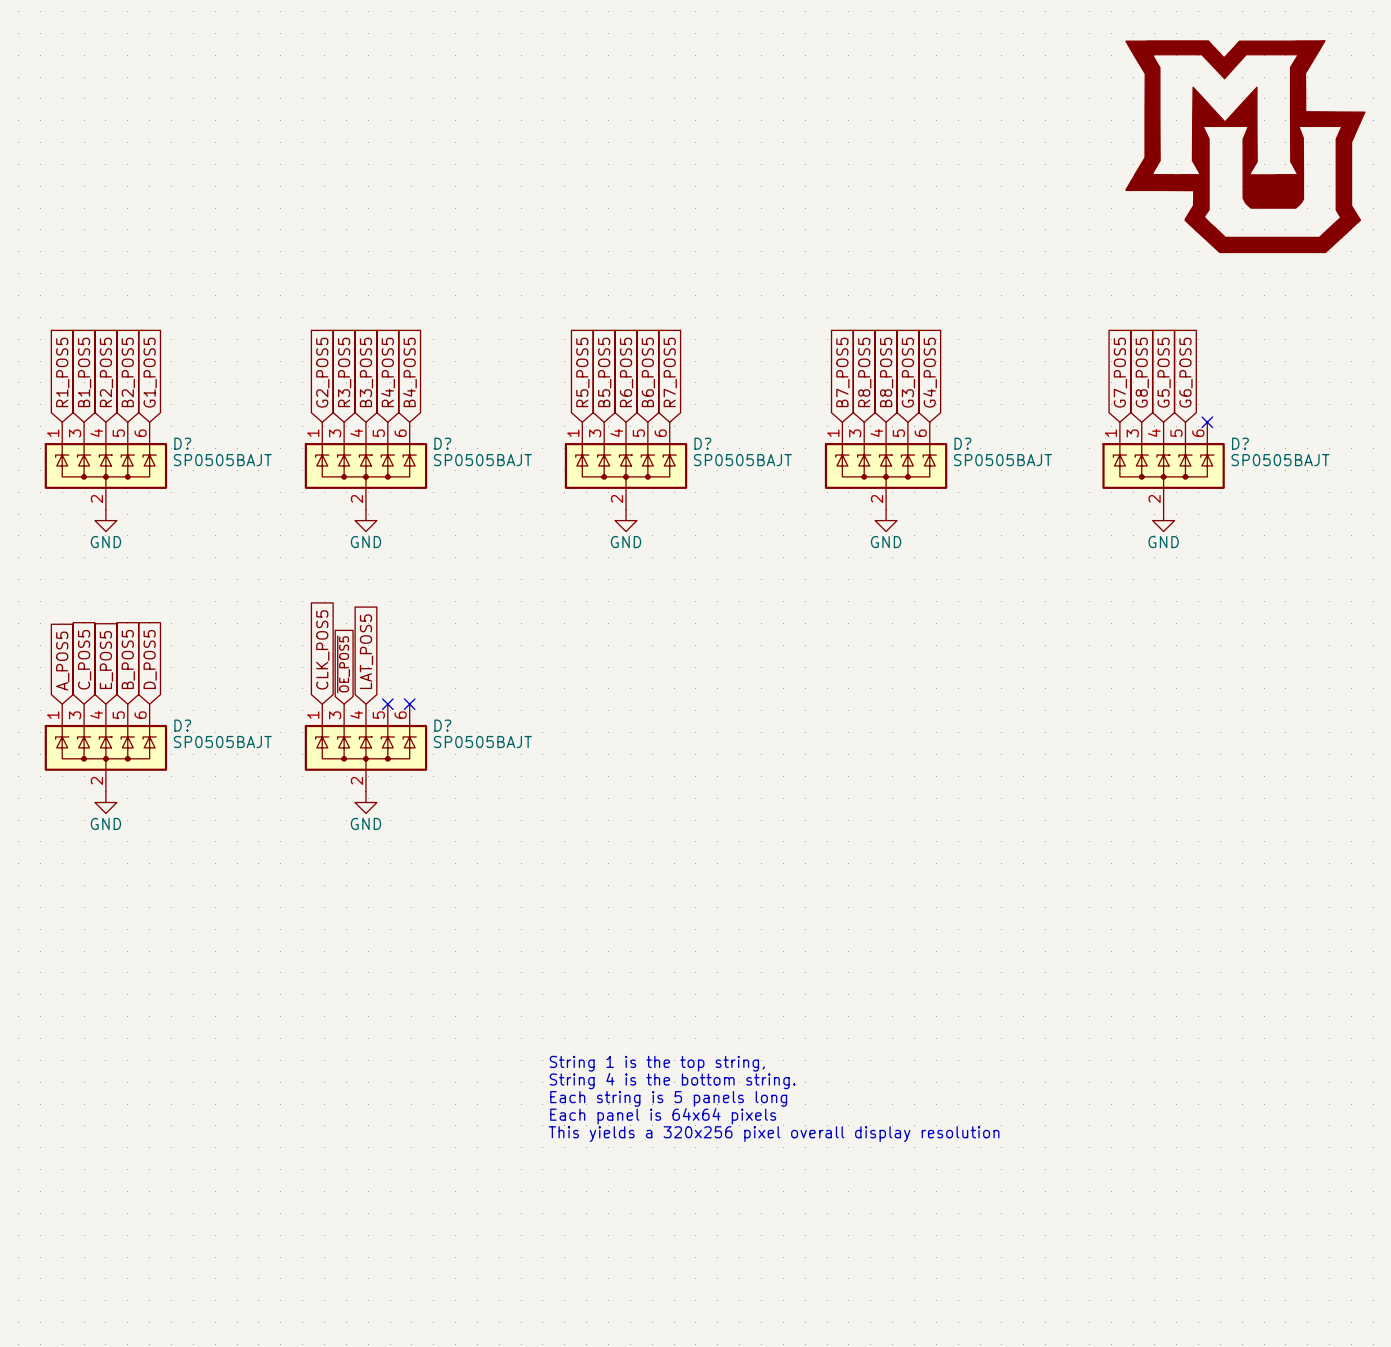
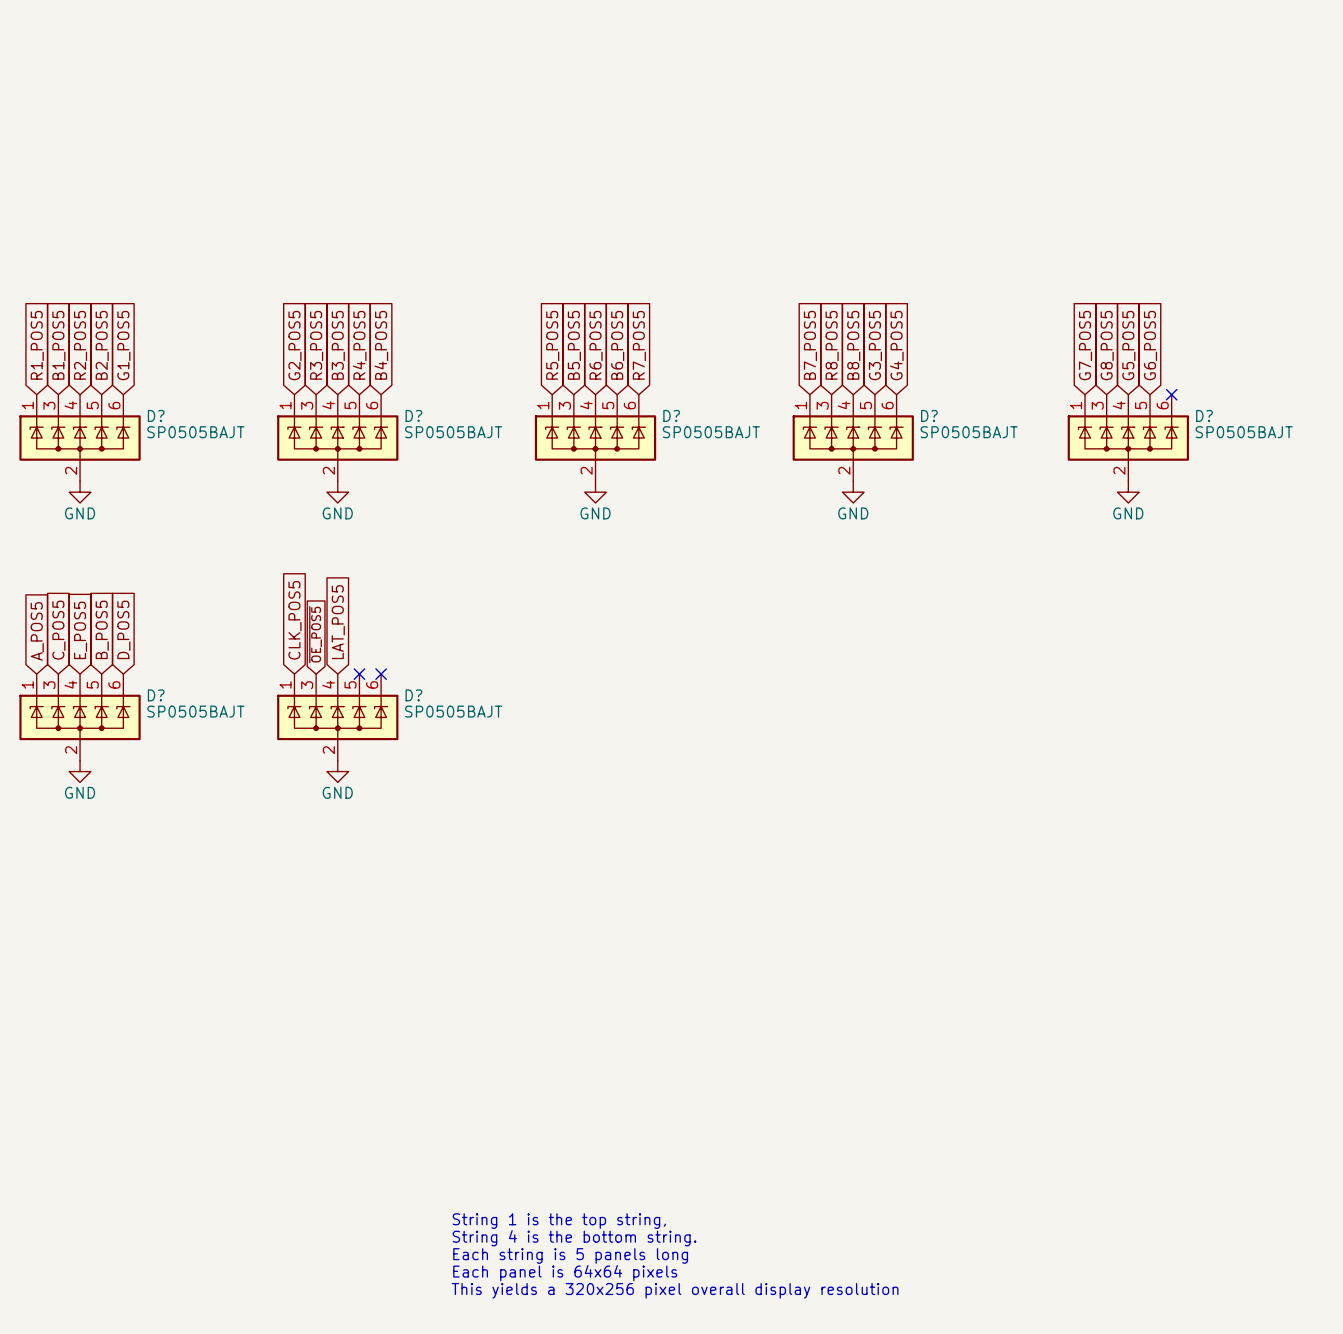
power symbol: (1245, 146) -> none
text position: String 1 is the top string, (657, 1063) -> String 1 is the top string, (559, 1221)
text position: String 4 is the bottom string. (672, 1081) -> String 4 is the bottom string. (574, 1238)
text position: Each string is 5 panels long (668, 1098) -> Each string is 5 panels long (570, 1255)
text position: Each panel is 64x64 pixels (663, 1116) -> Each panel is 64x64 pixels (565, 1273)
text position: This yields a 320x256 pixel overall display resolution (774, 1134) -> This yields a 320x256 pixel overall display resolution (675, 1290)

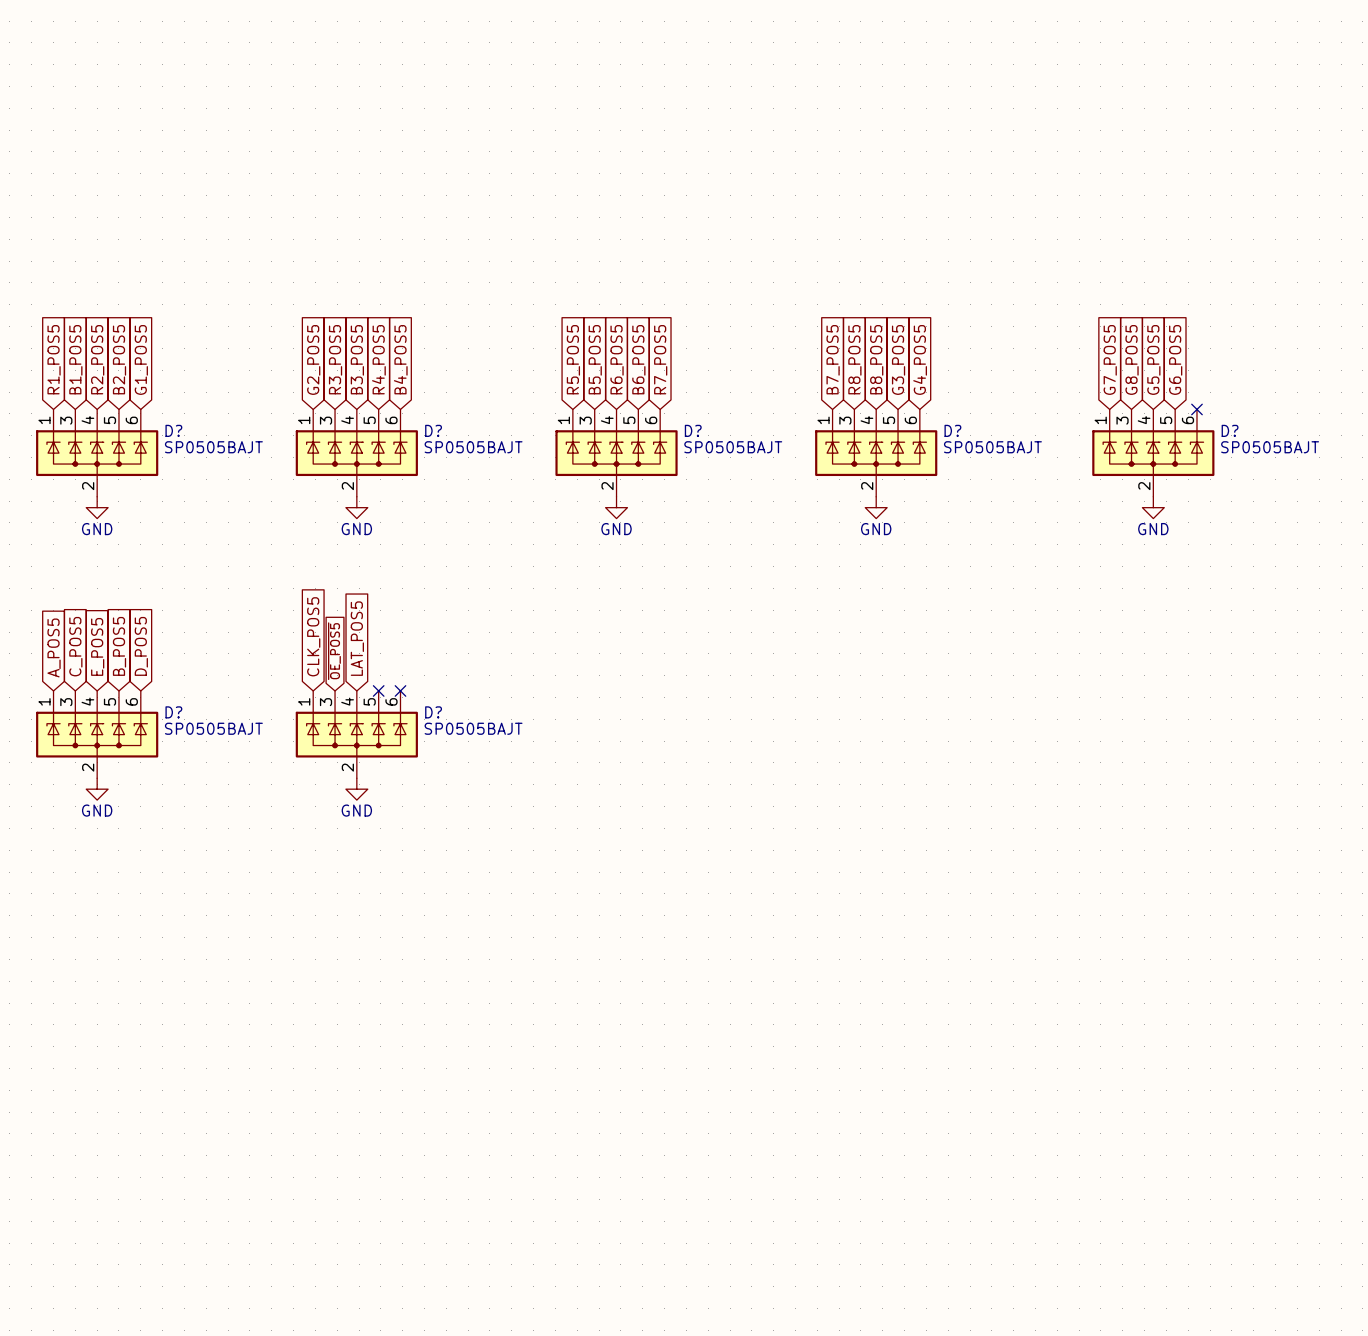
text: String 1 is the top string, (559, 1221) -> none
text: String 4 is the bottom string. (574, 1238) -> none
text: Each string is 5 panels long (570, 1255) -> none
text: Each panel is 64x64 pixels (565, 1273) -> none
text: This yields a 320x256 pixel overall display resolution (675, 1290) -> none

